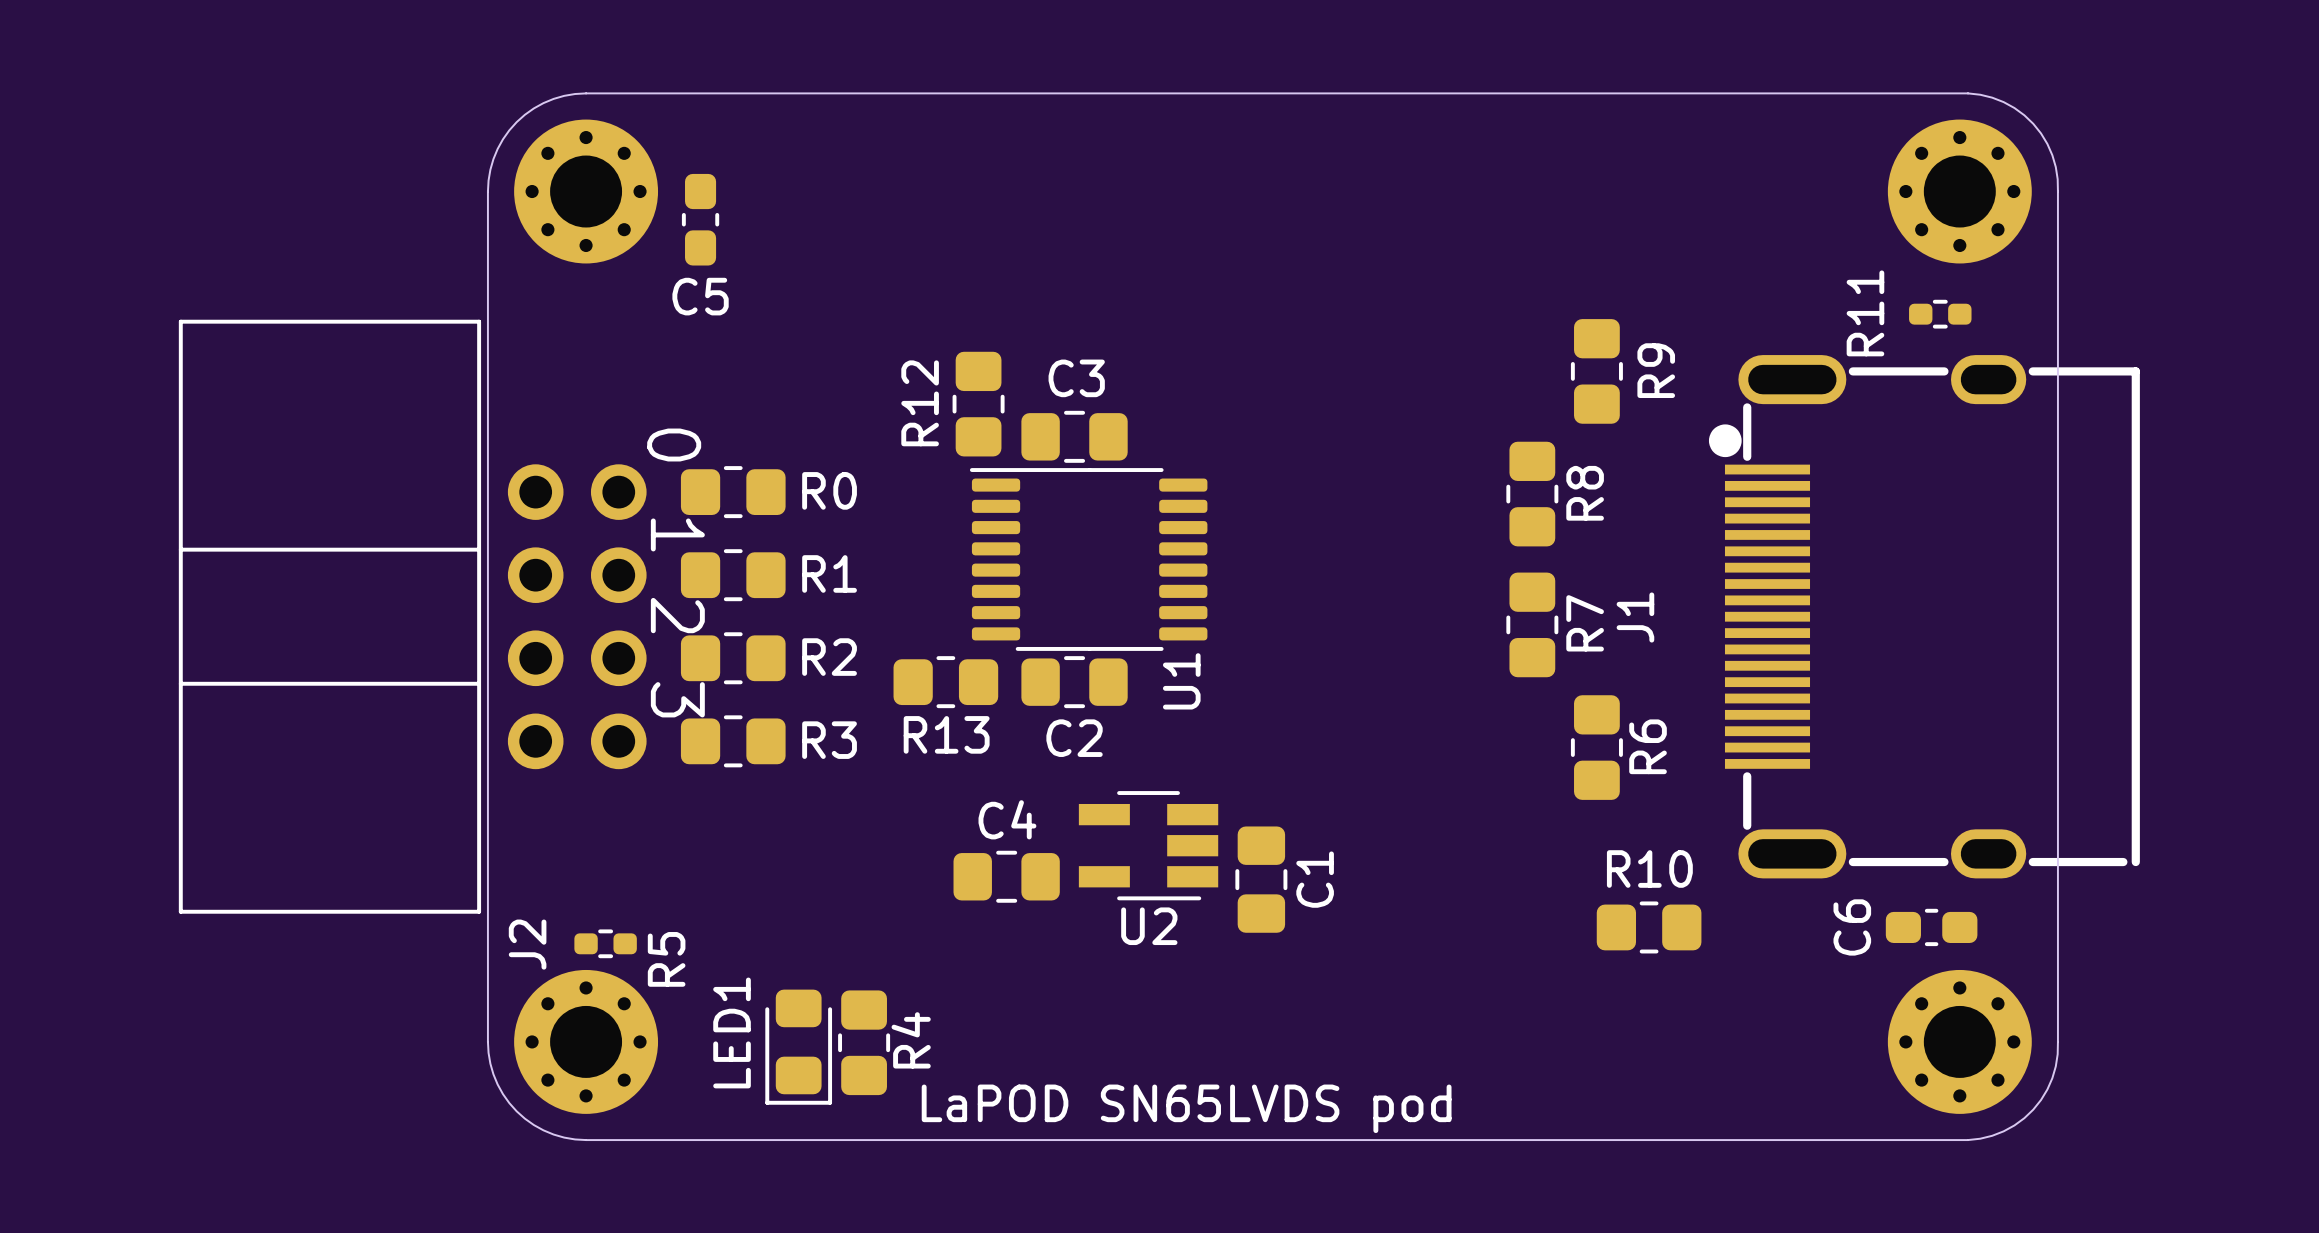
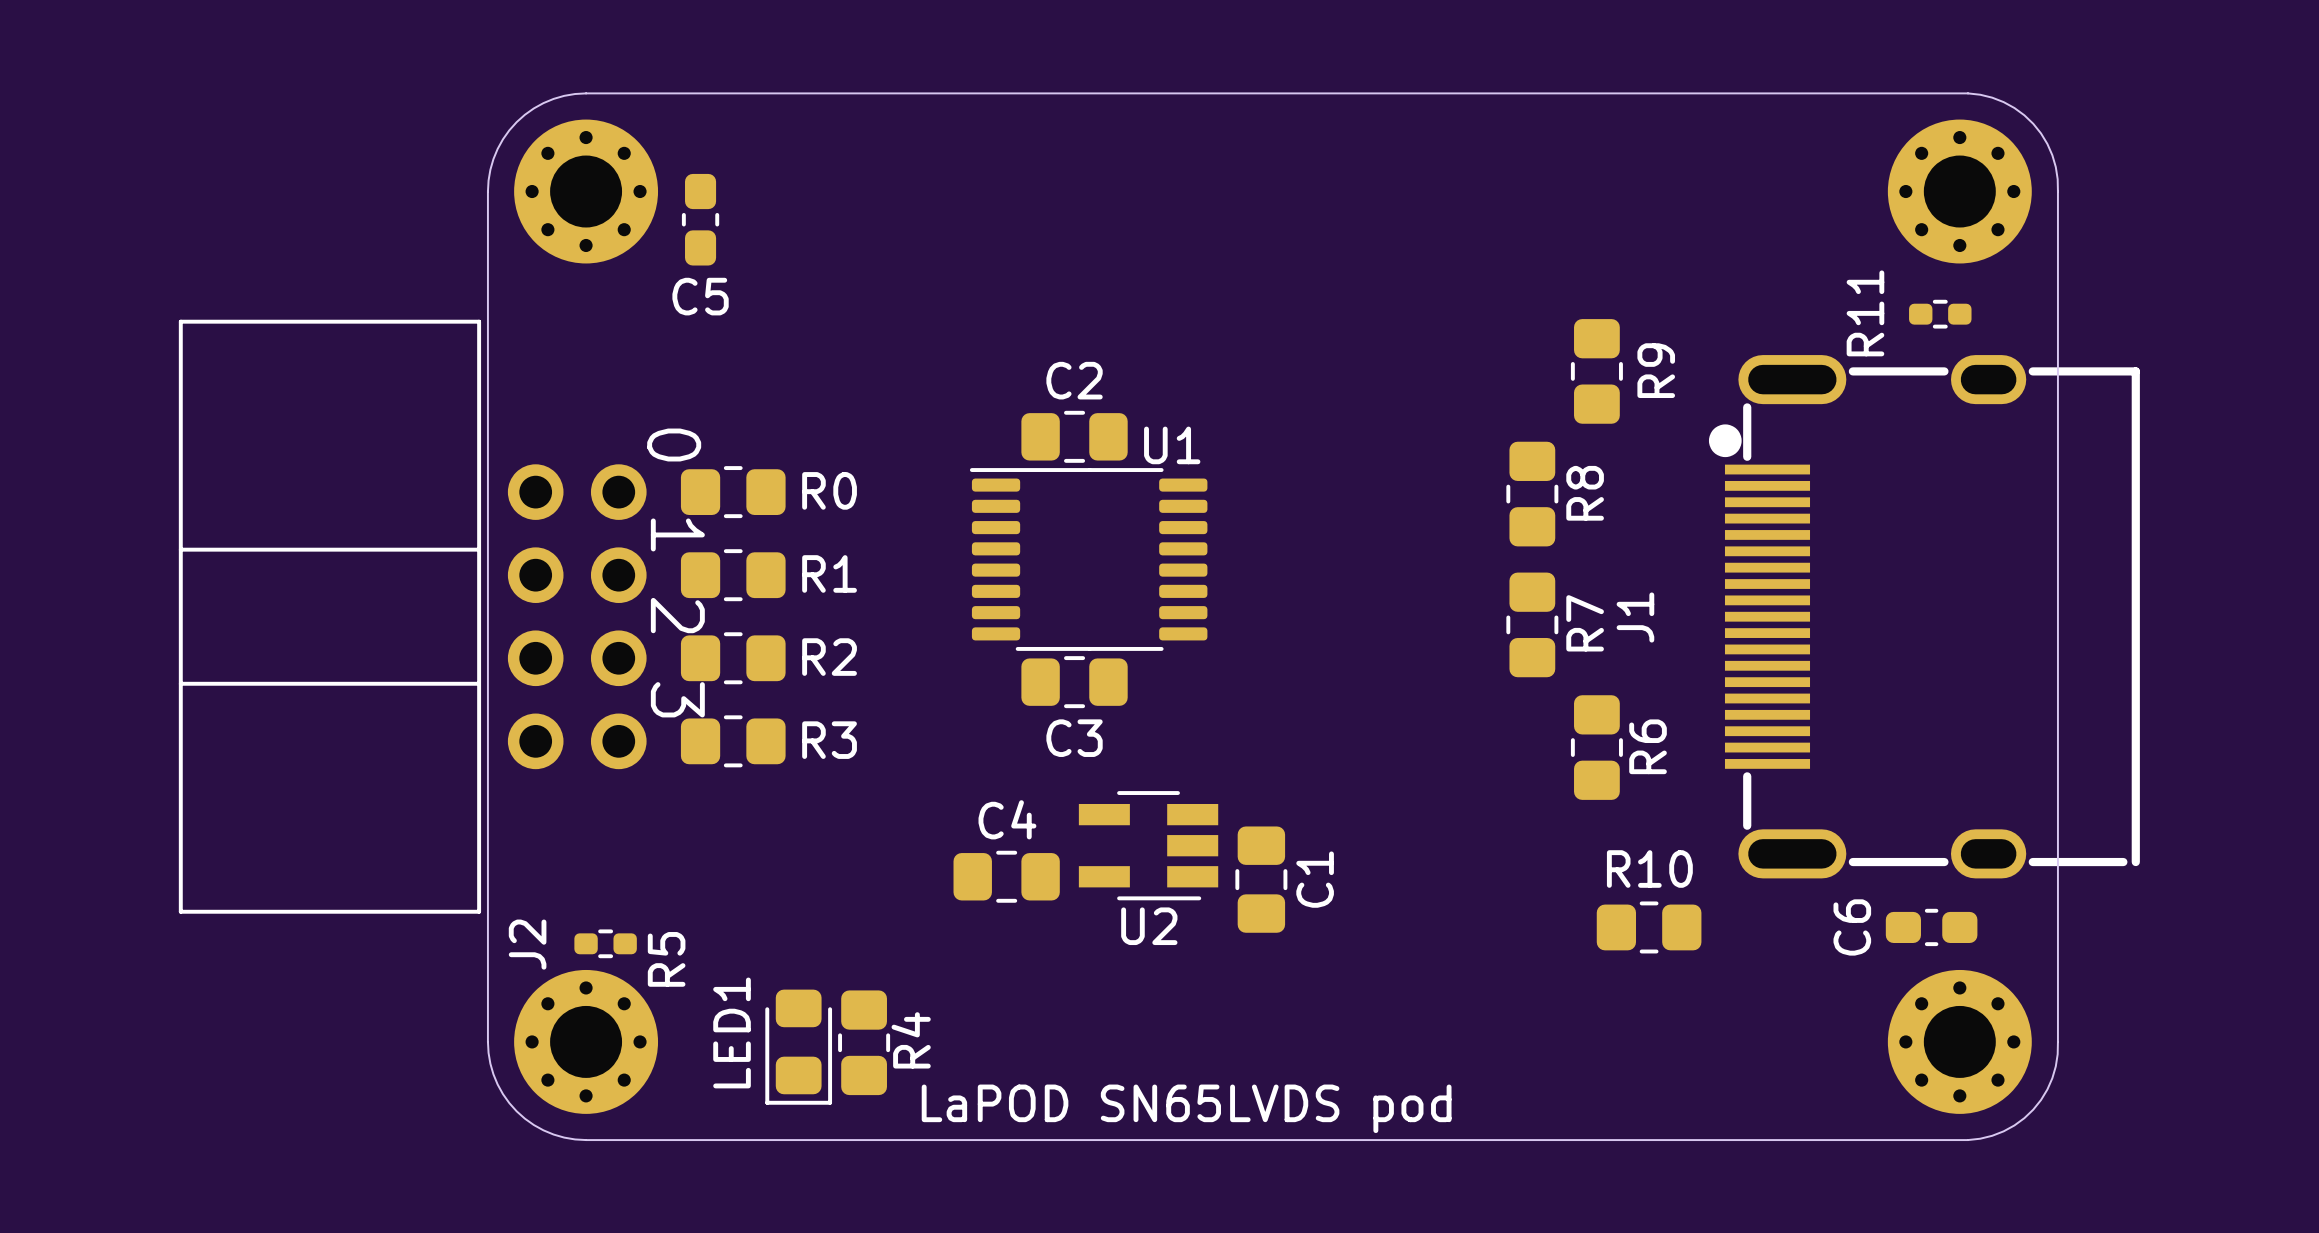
C3 name: C3 (1076, 378) -> C2 (1074, 380)
R12: (978, 404) -> none
U1 name rotation: 0° (1181, 681) -> 90° clockwise (1172, 445)
U1 name position: U1 (1181, 681) -> U1 (1172, 445)
R13: (945, 682) -> none
C2 name: C2 (1074, 738) -> C3 (1074, 738)

